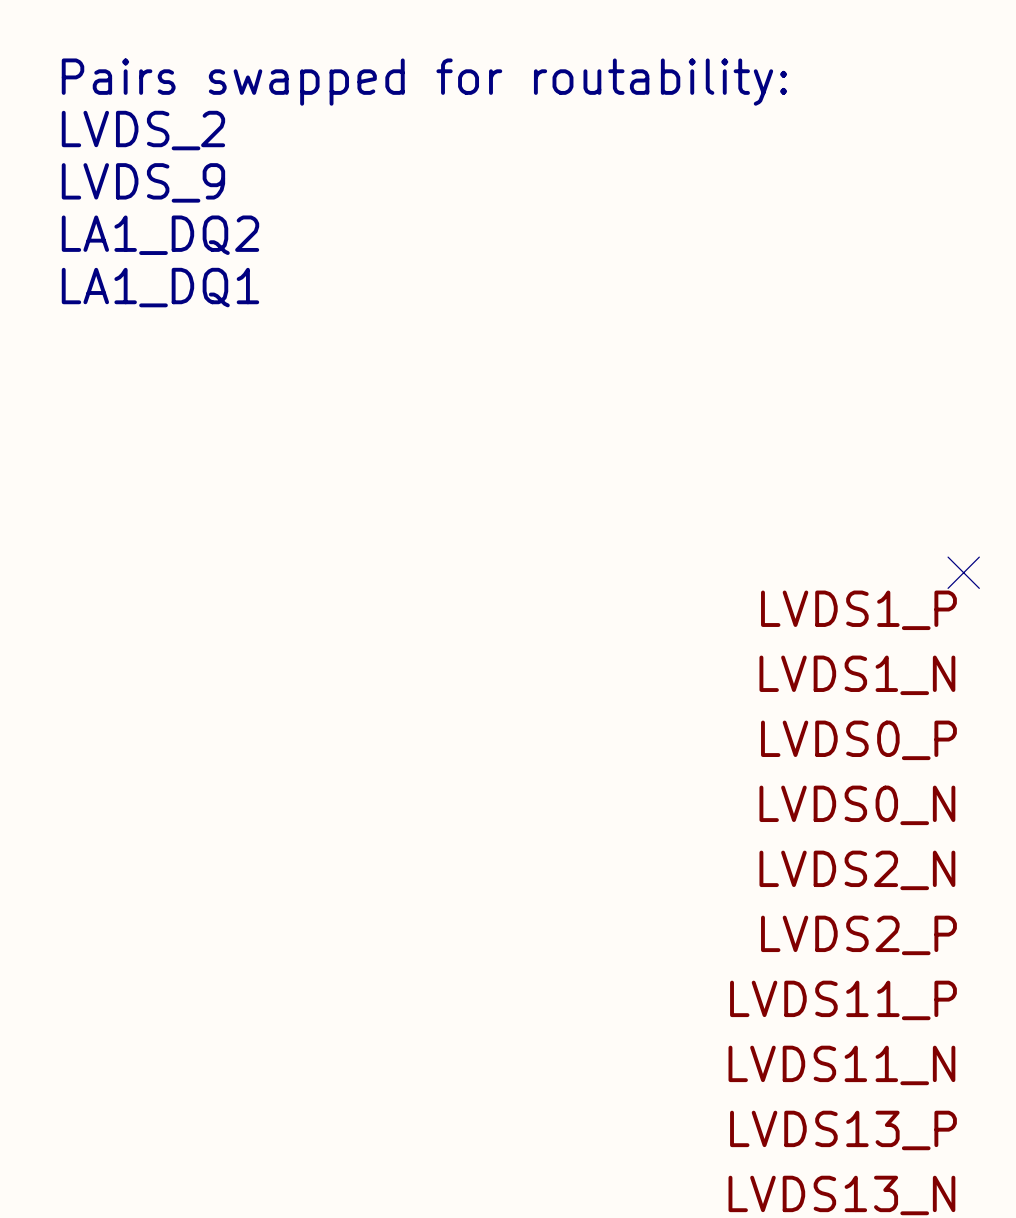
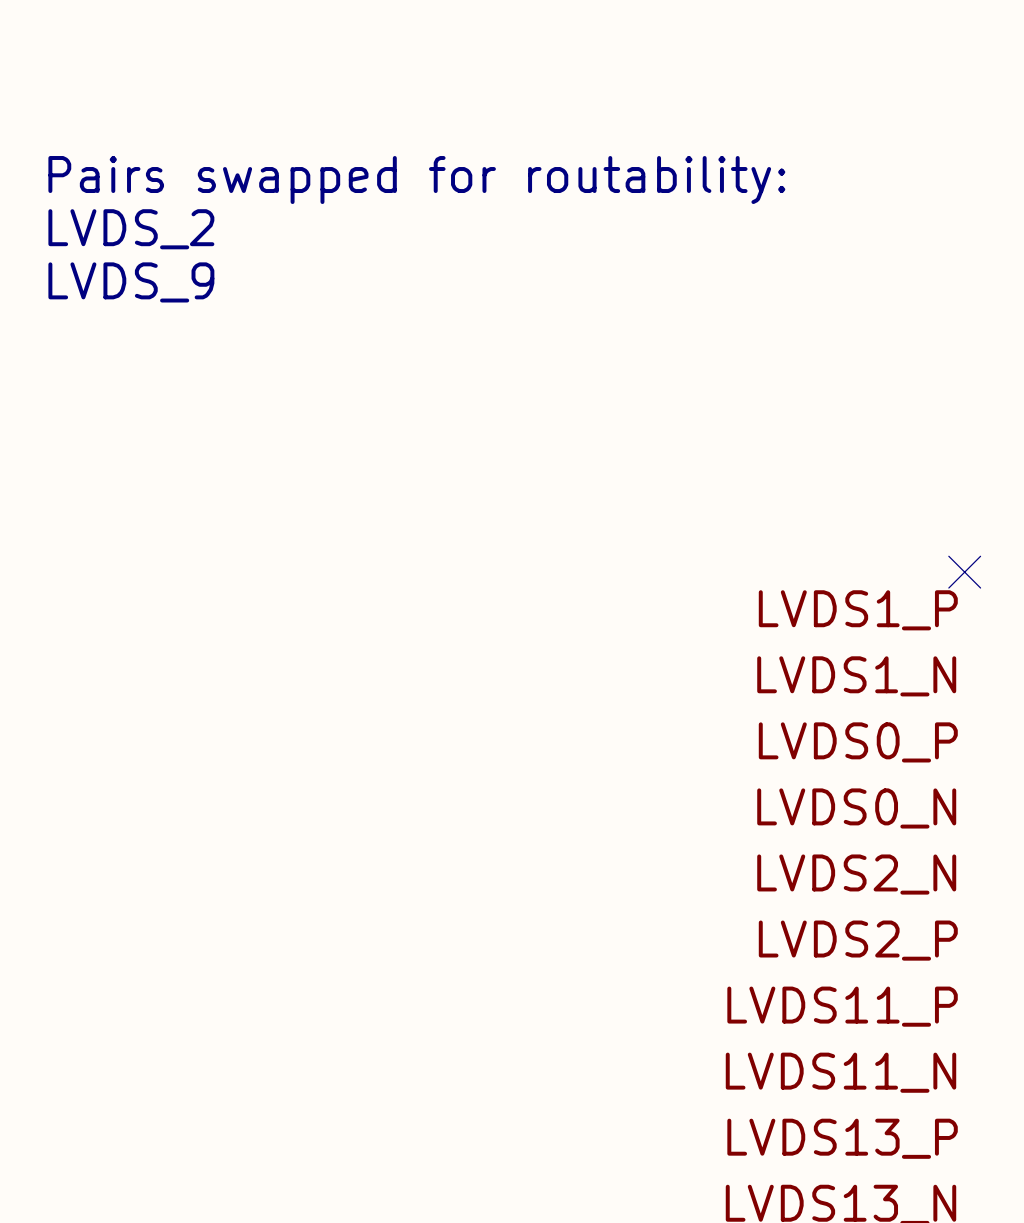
text: Pairs swapped for routability: (424, 82) -> none
text: LVDS_2 (143, 130) -> none
text: LVDS_9 (143, 182) -> Pairs swapped for routability: (416, 180)
text: LA1_DQ2 (160, 235) -> LVDS_2 (131, 229)
text: LA1_DQ1 (160, 287) -> LVDS_9 (131, 282)

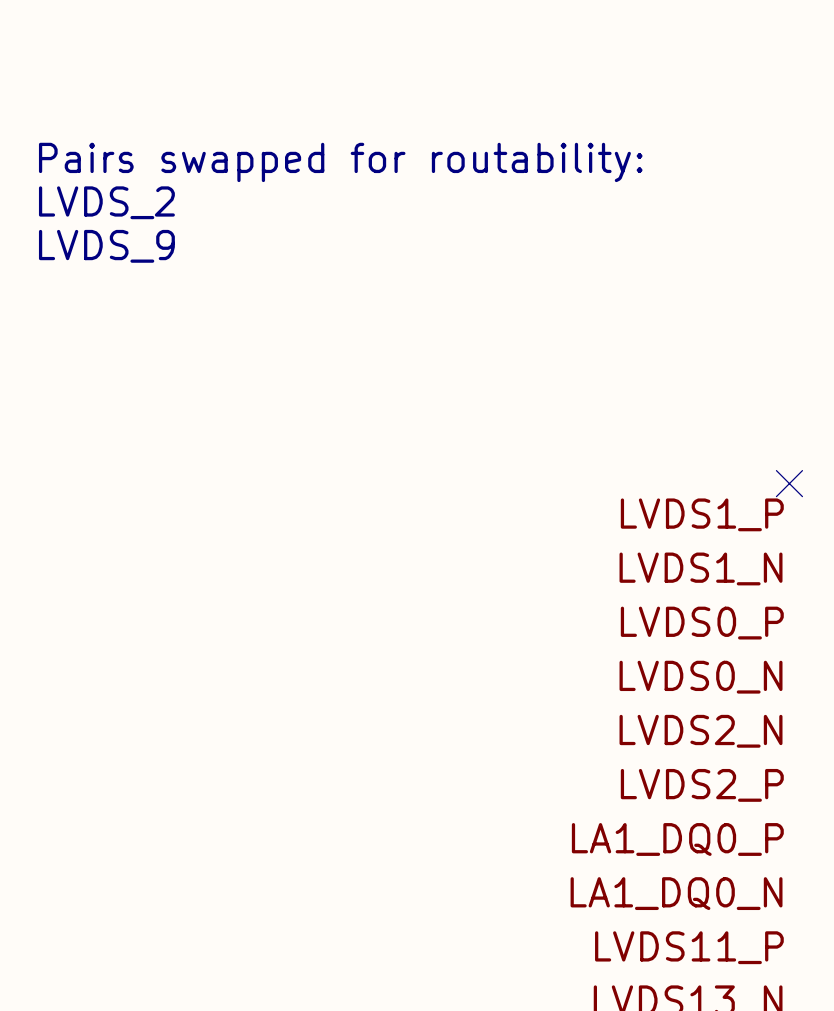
label: LVDS11_P (842, 1006) -> LA1_DQ0_P (677, 839)
label: LVDS11_N (840, 1072) -> LA1_DQ0_N (676, 893)
label: LVDS13_P (842, 1138) -> LVDS11_P (689, 947)

